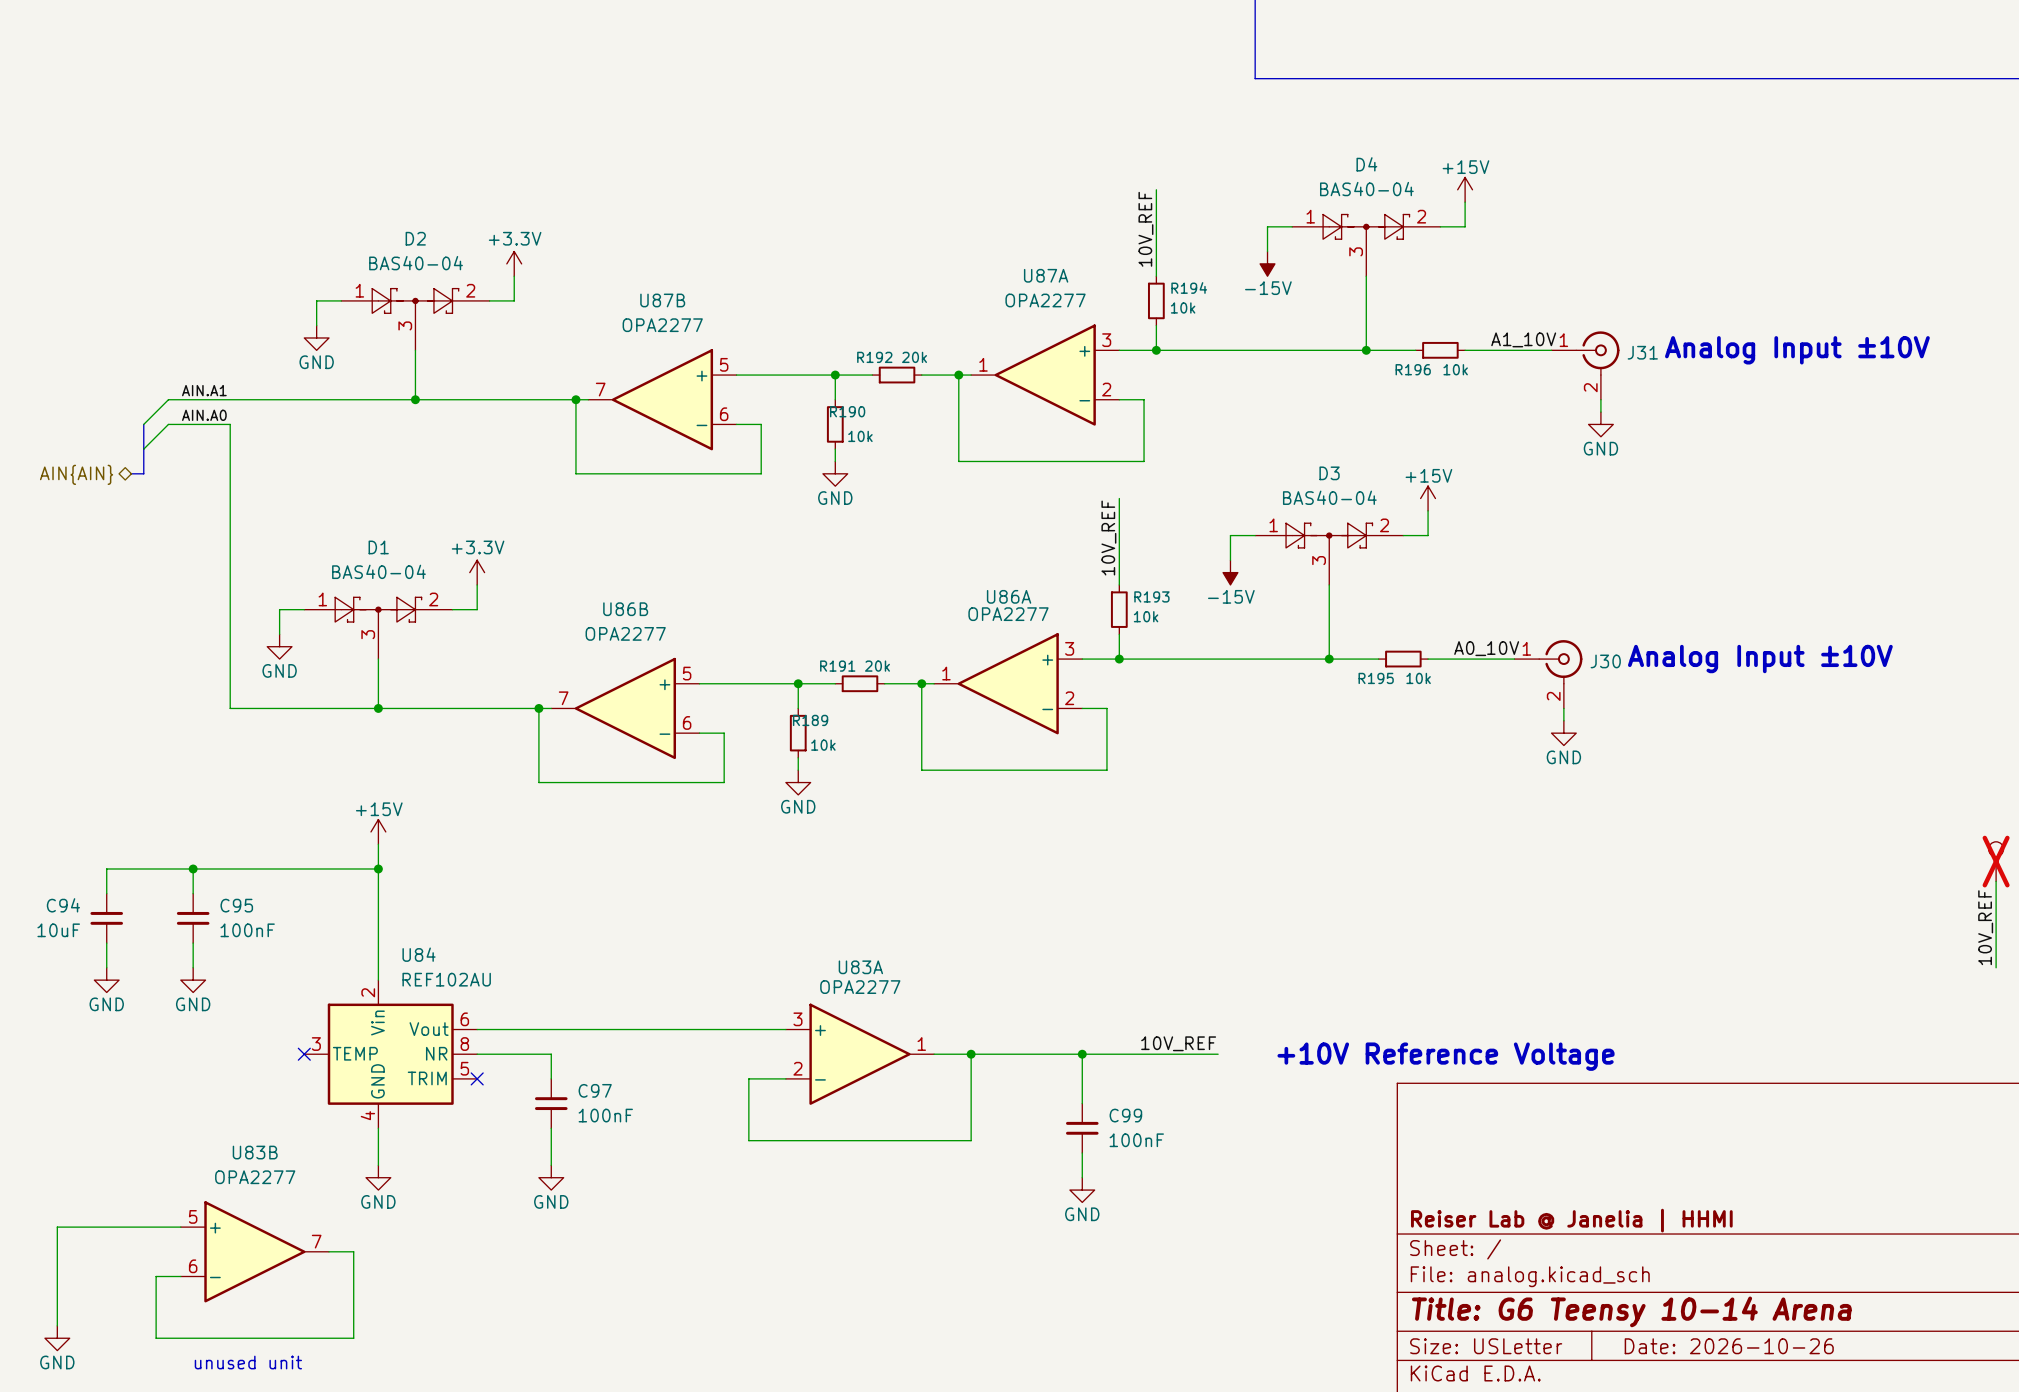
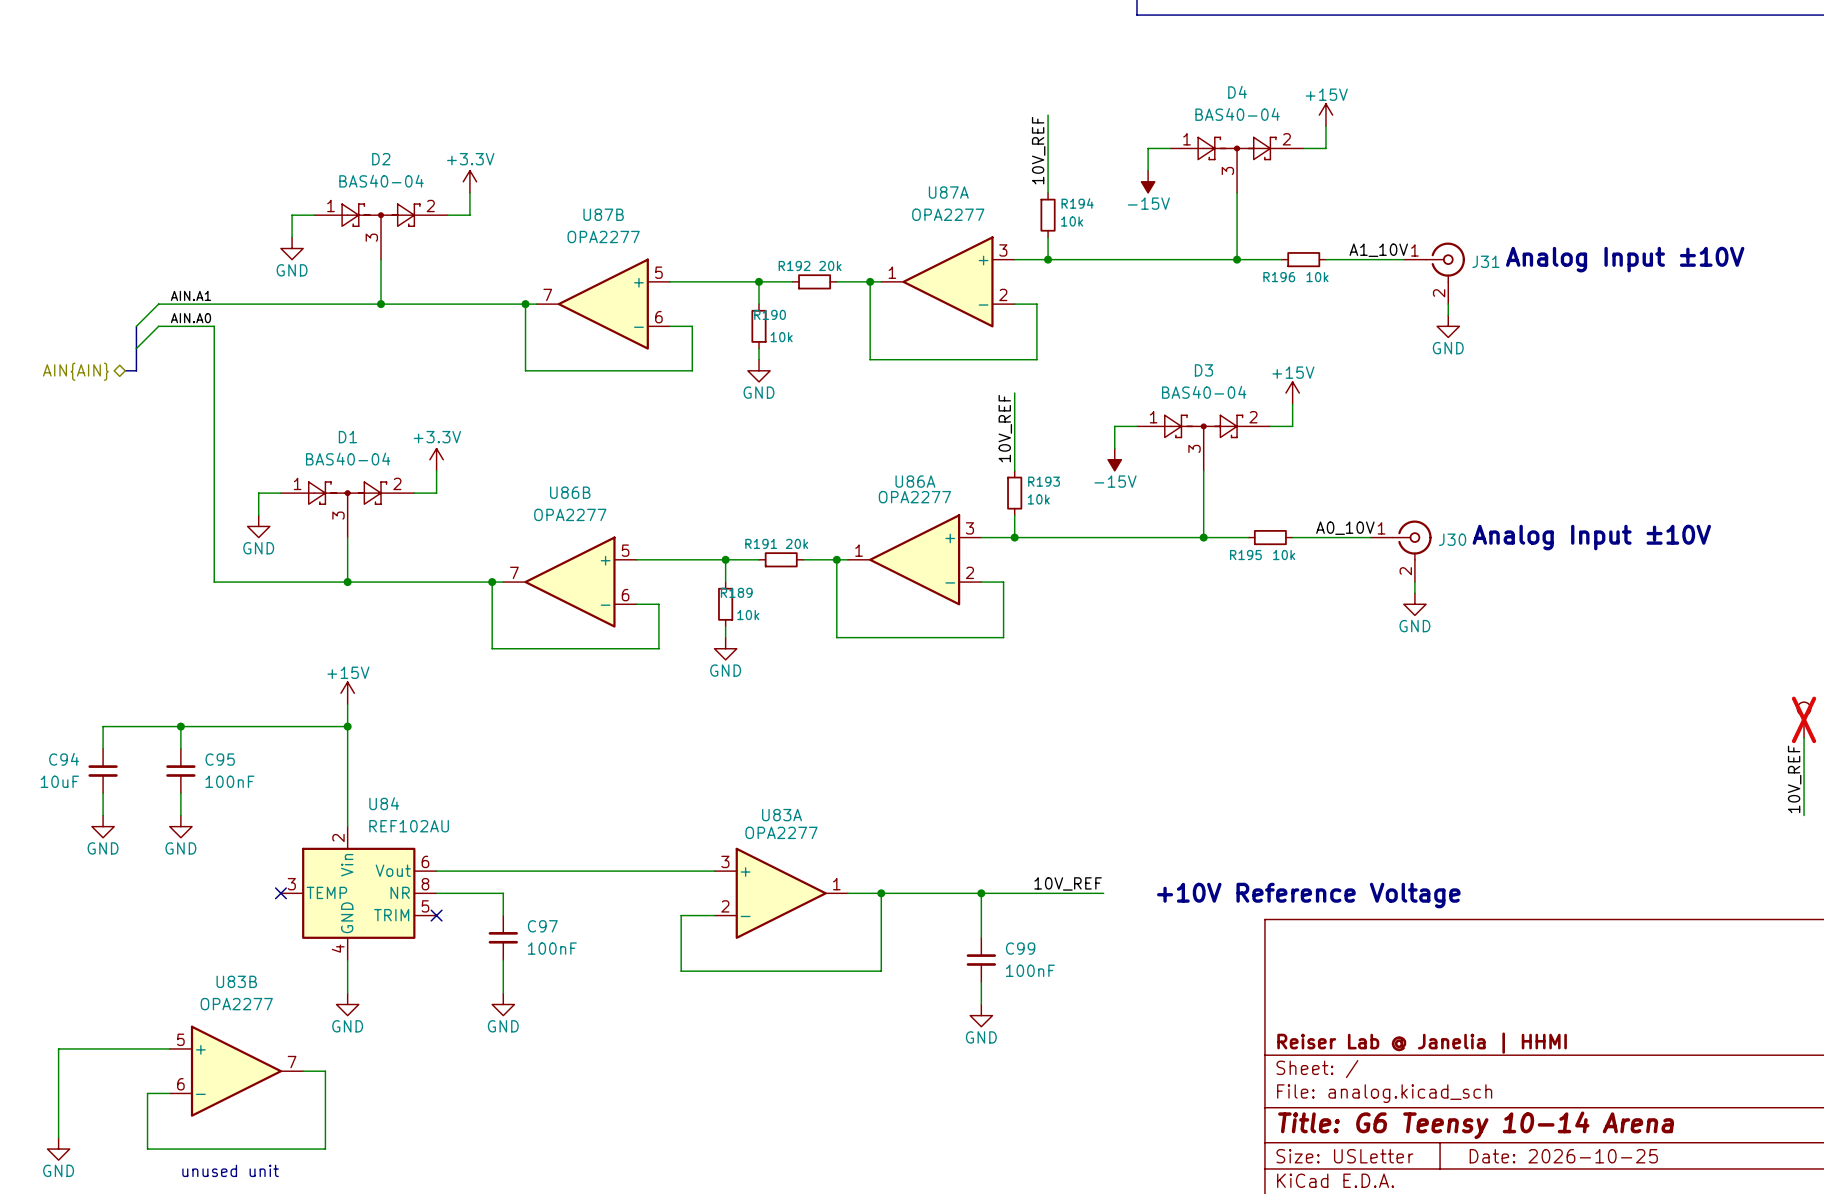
title block: Date: 2026-10-26 (1729, 1346) -> Date: 2026-10-25 (1563, 1156)

